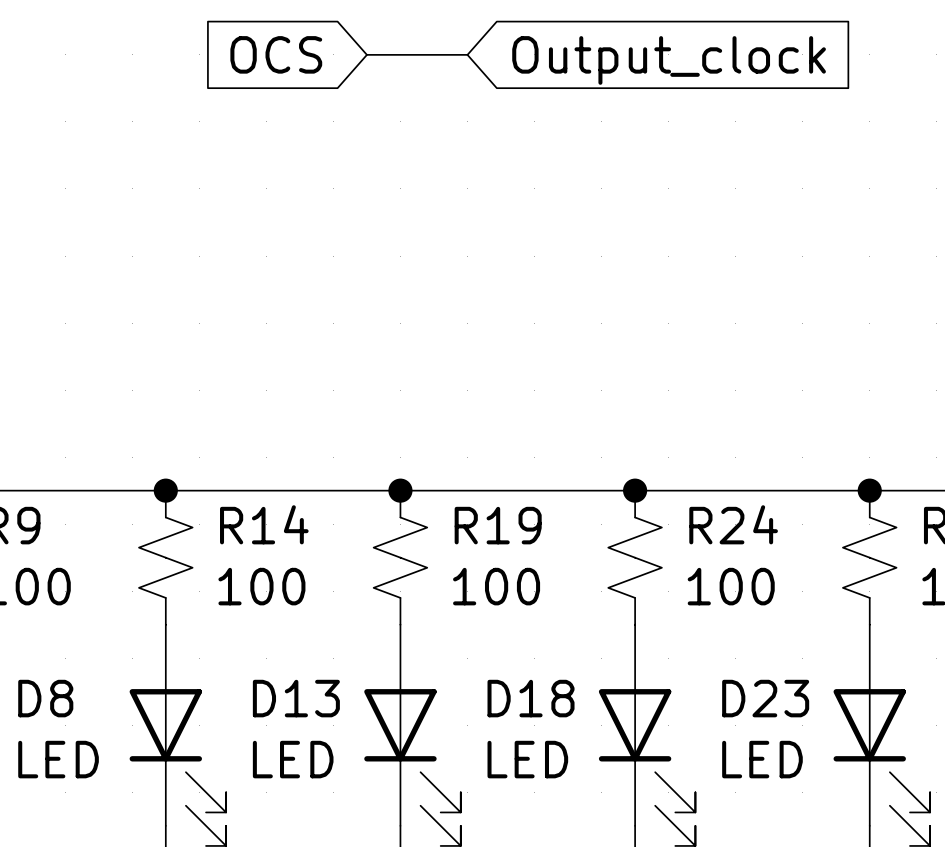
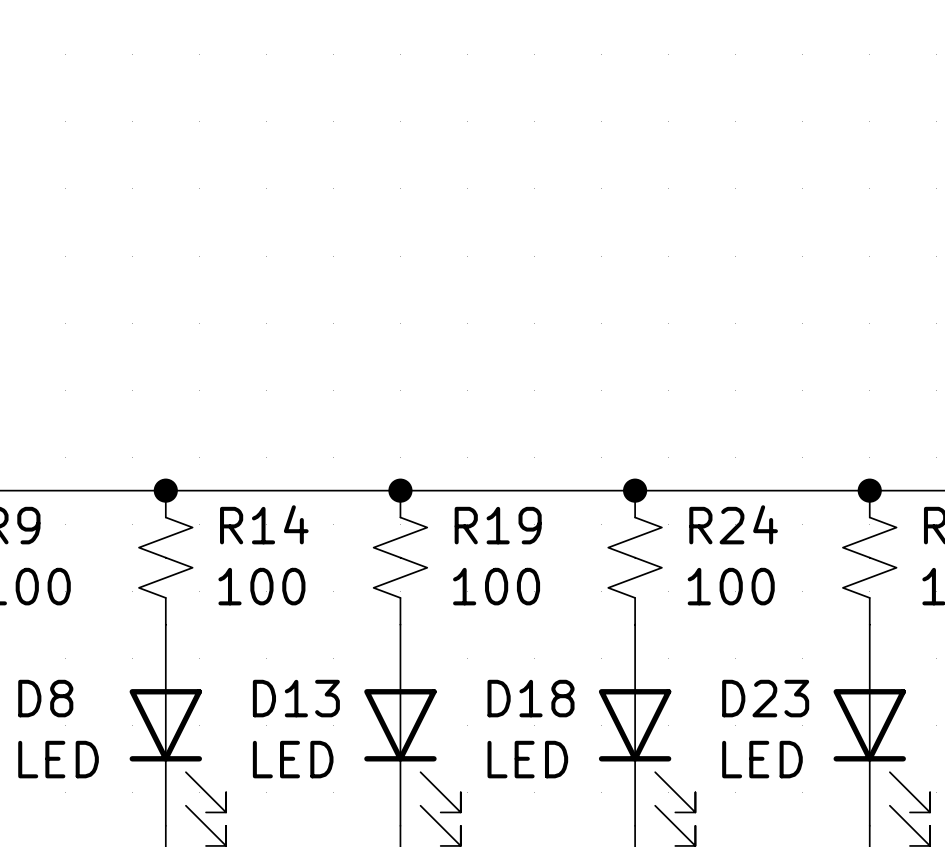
global label: OCS (276, 54) -> none
wire: (366, 54) (467, 54) -> none
global label: Output_clock (669, 60) -> none

